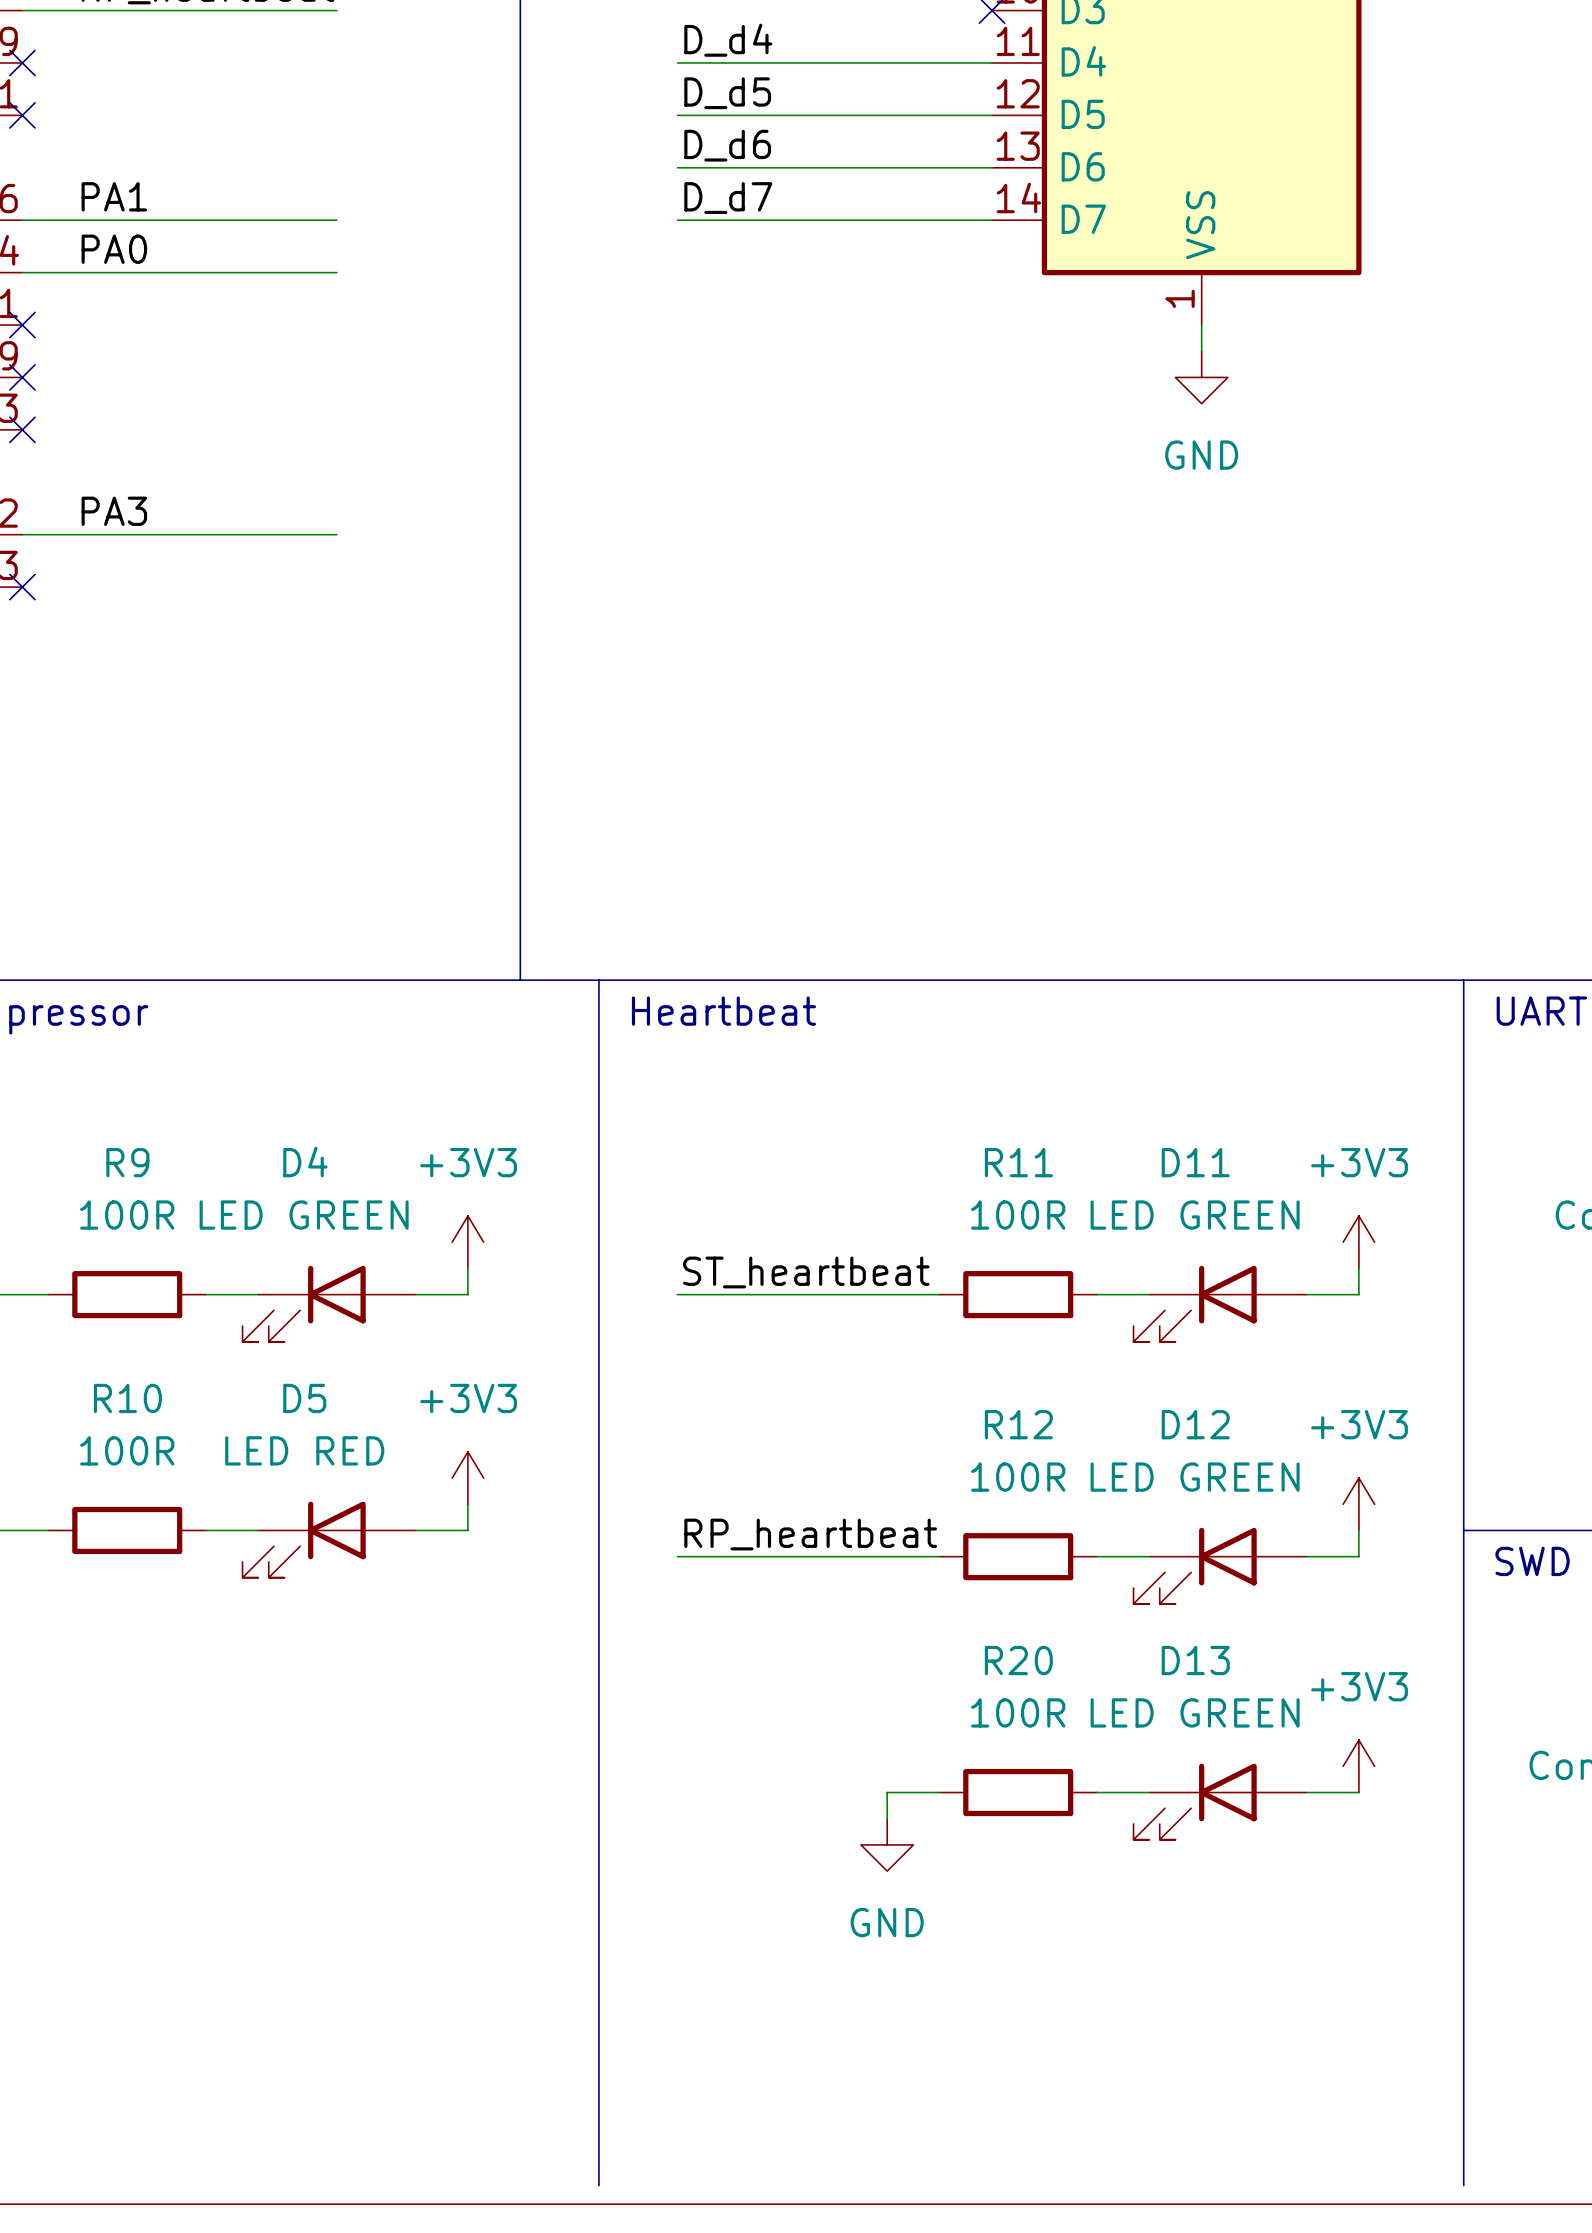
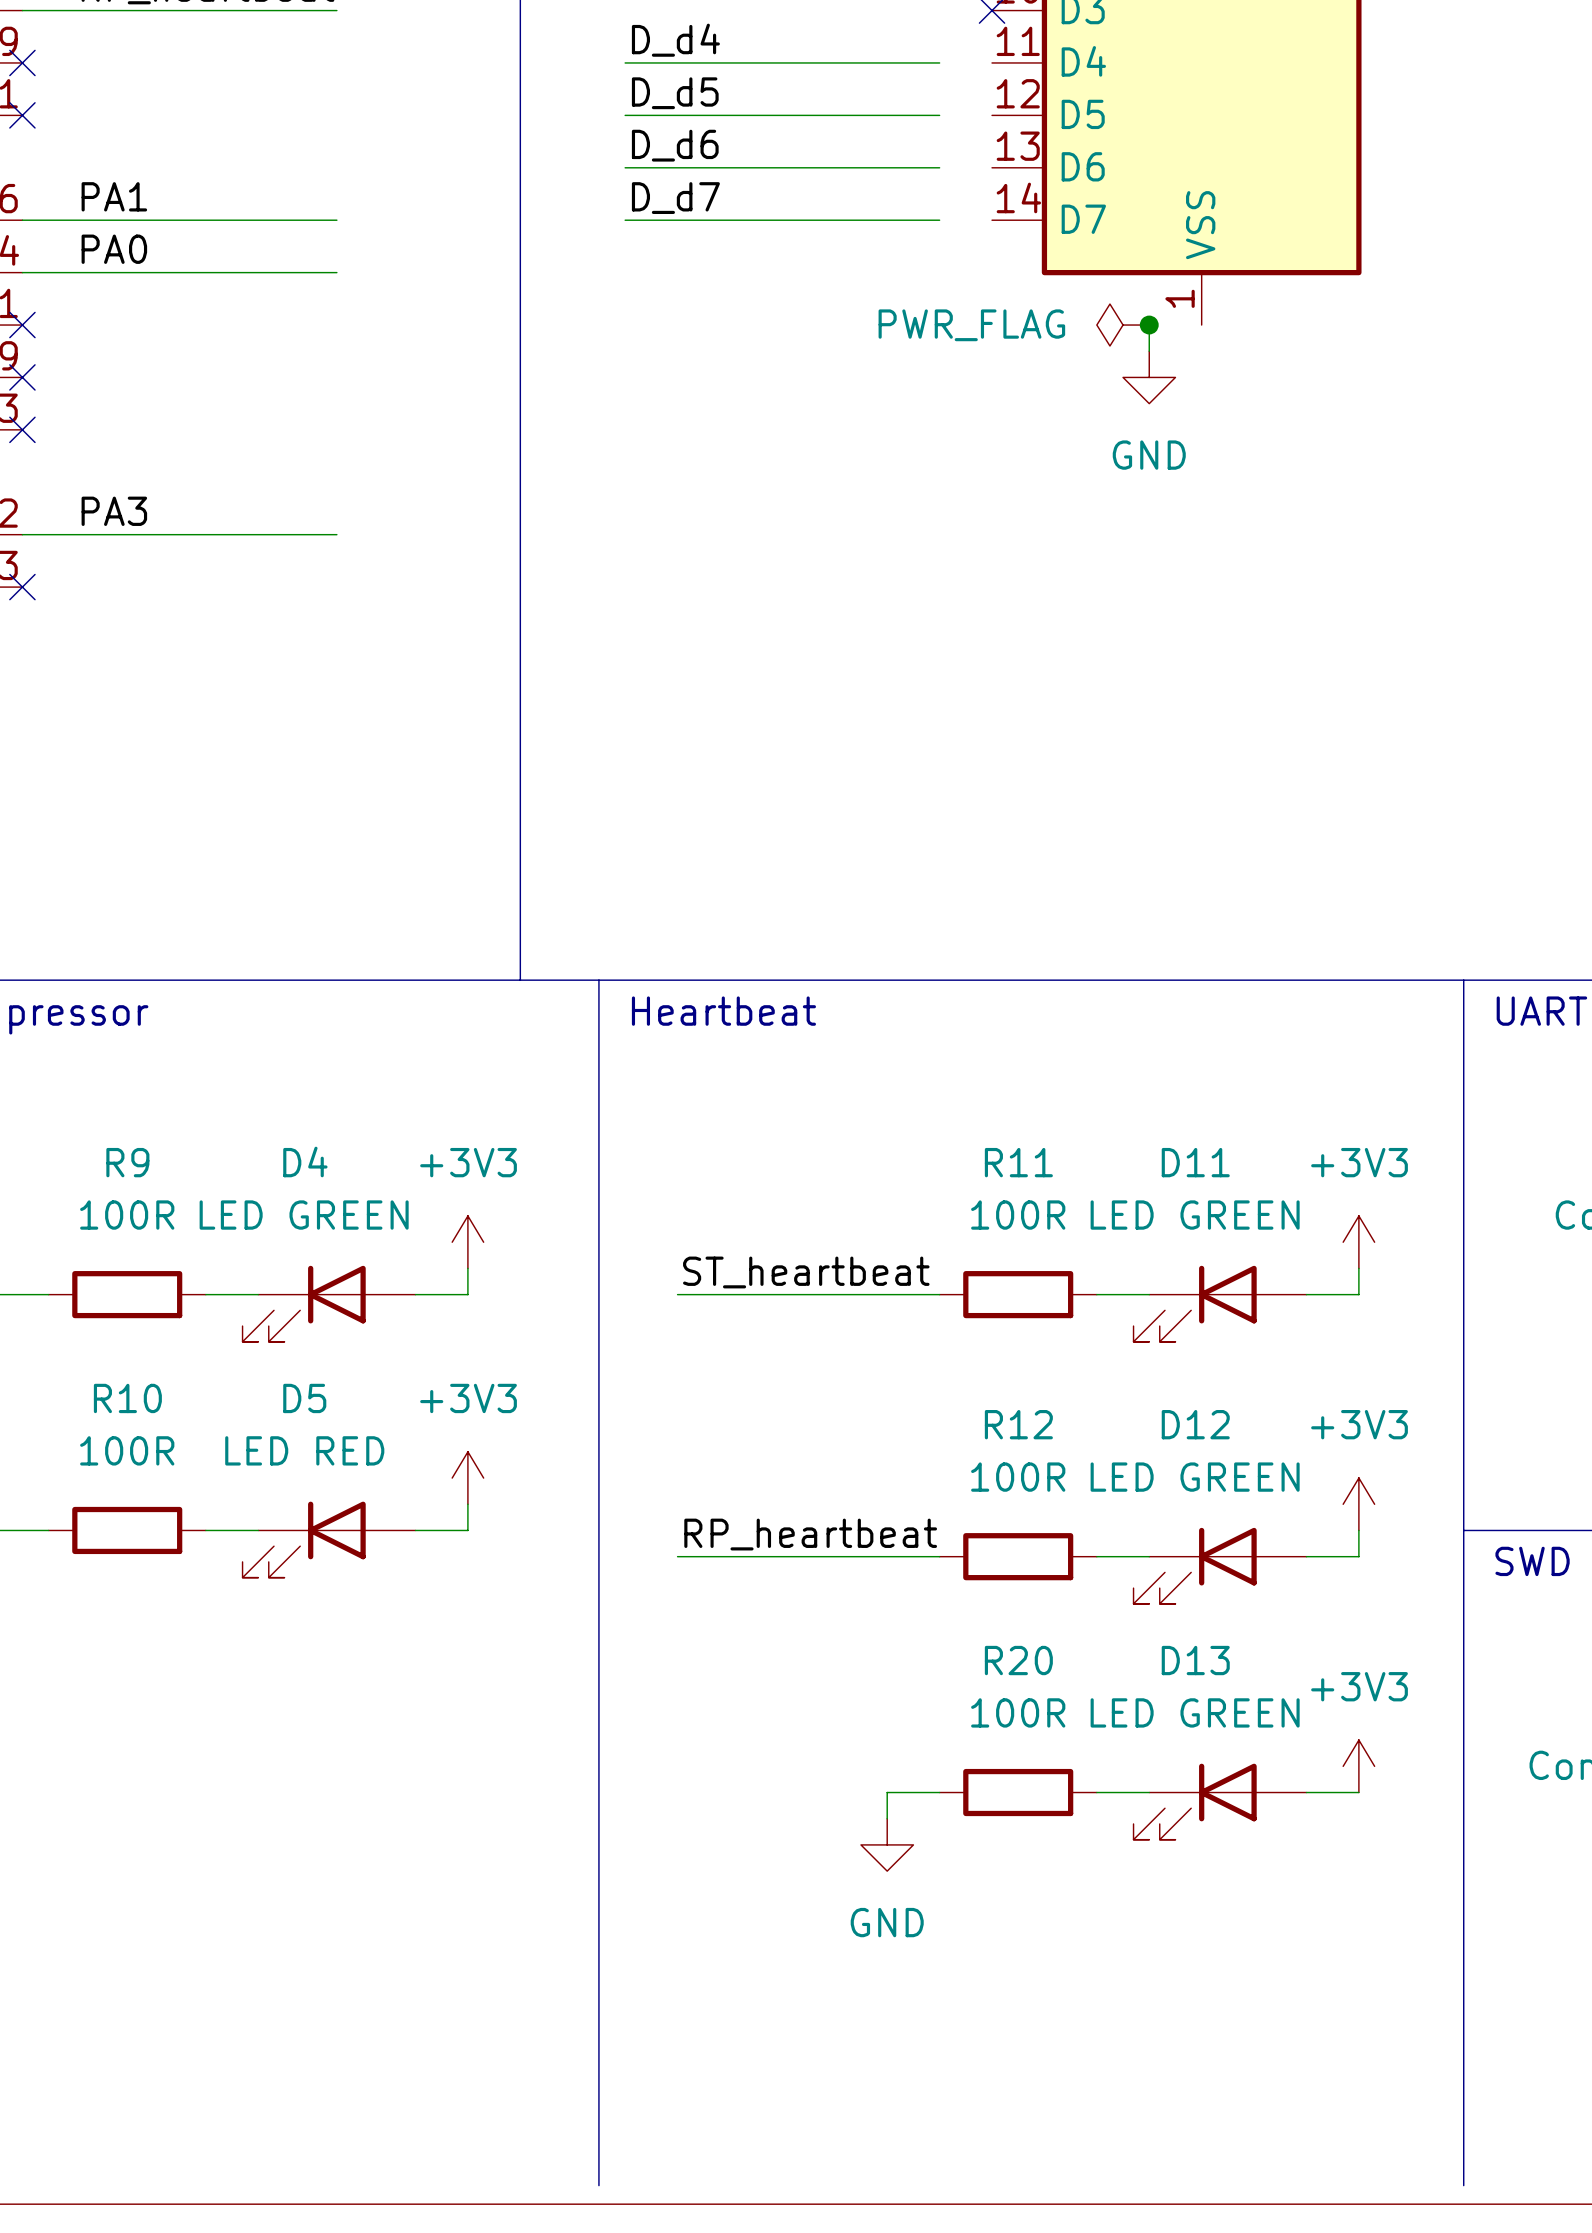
label position: D_d4 (728, 40) -> D_d4 (675, 40)
wire: (939, 62) (992, 62) -> (625, 62) (677, 62)
label position: D_d5 (727, 93) -> D_d5 (675, 93)
wire: (939, 115) (992, 115) -> (625, 115) (677, 115)
label position: D_d6 (727, 145) -> D_d6 (675, 145)
wire: (939, 167) (992, 167) -> (625, 167) (677, 167)
label position: D_d7 (728, 198) -> D_d7 (675, 198)
wire: (939, 220) (992, 220) -> (625, 220) (677, 220)
power symbol: none -> PWR_FLAG (1123, 325)
junction: none -> (1149, 325)
wire: (1201, 325) (1201, 351) -> (1149, 325) (1149, 351)
power symbol position: GND (1201, 377) -> GND (1149, 377)

